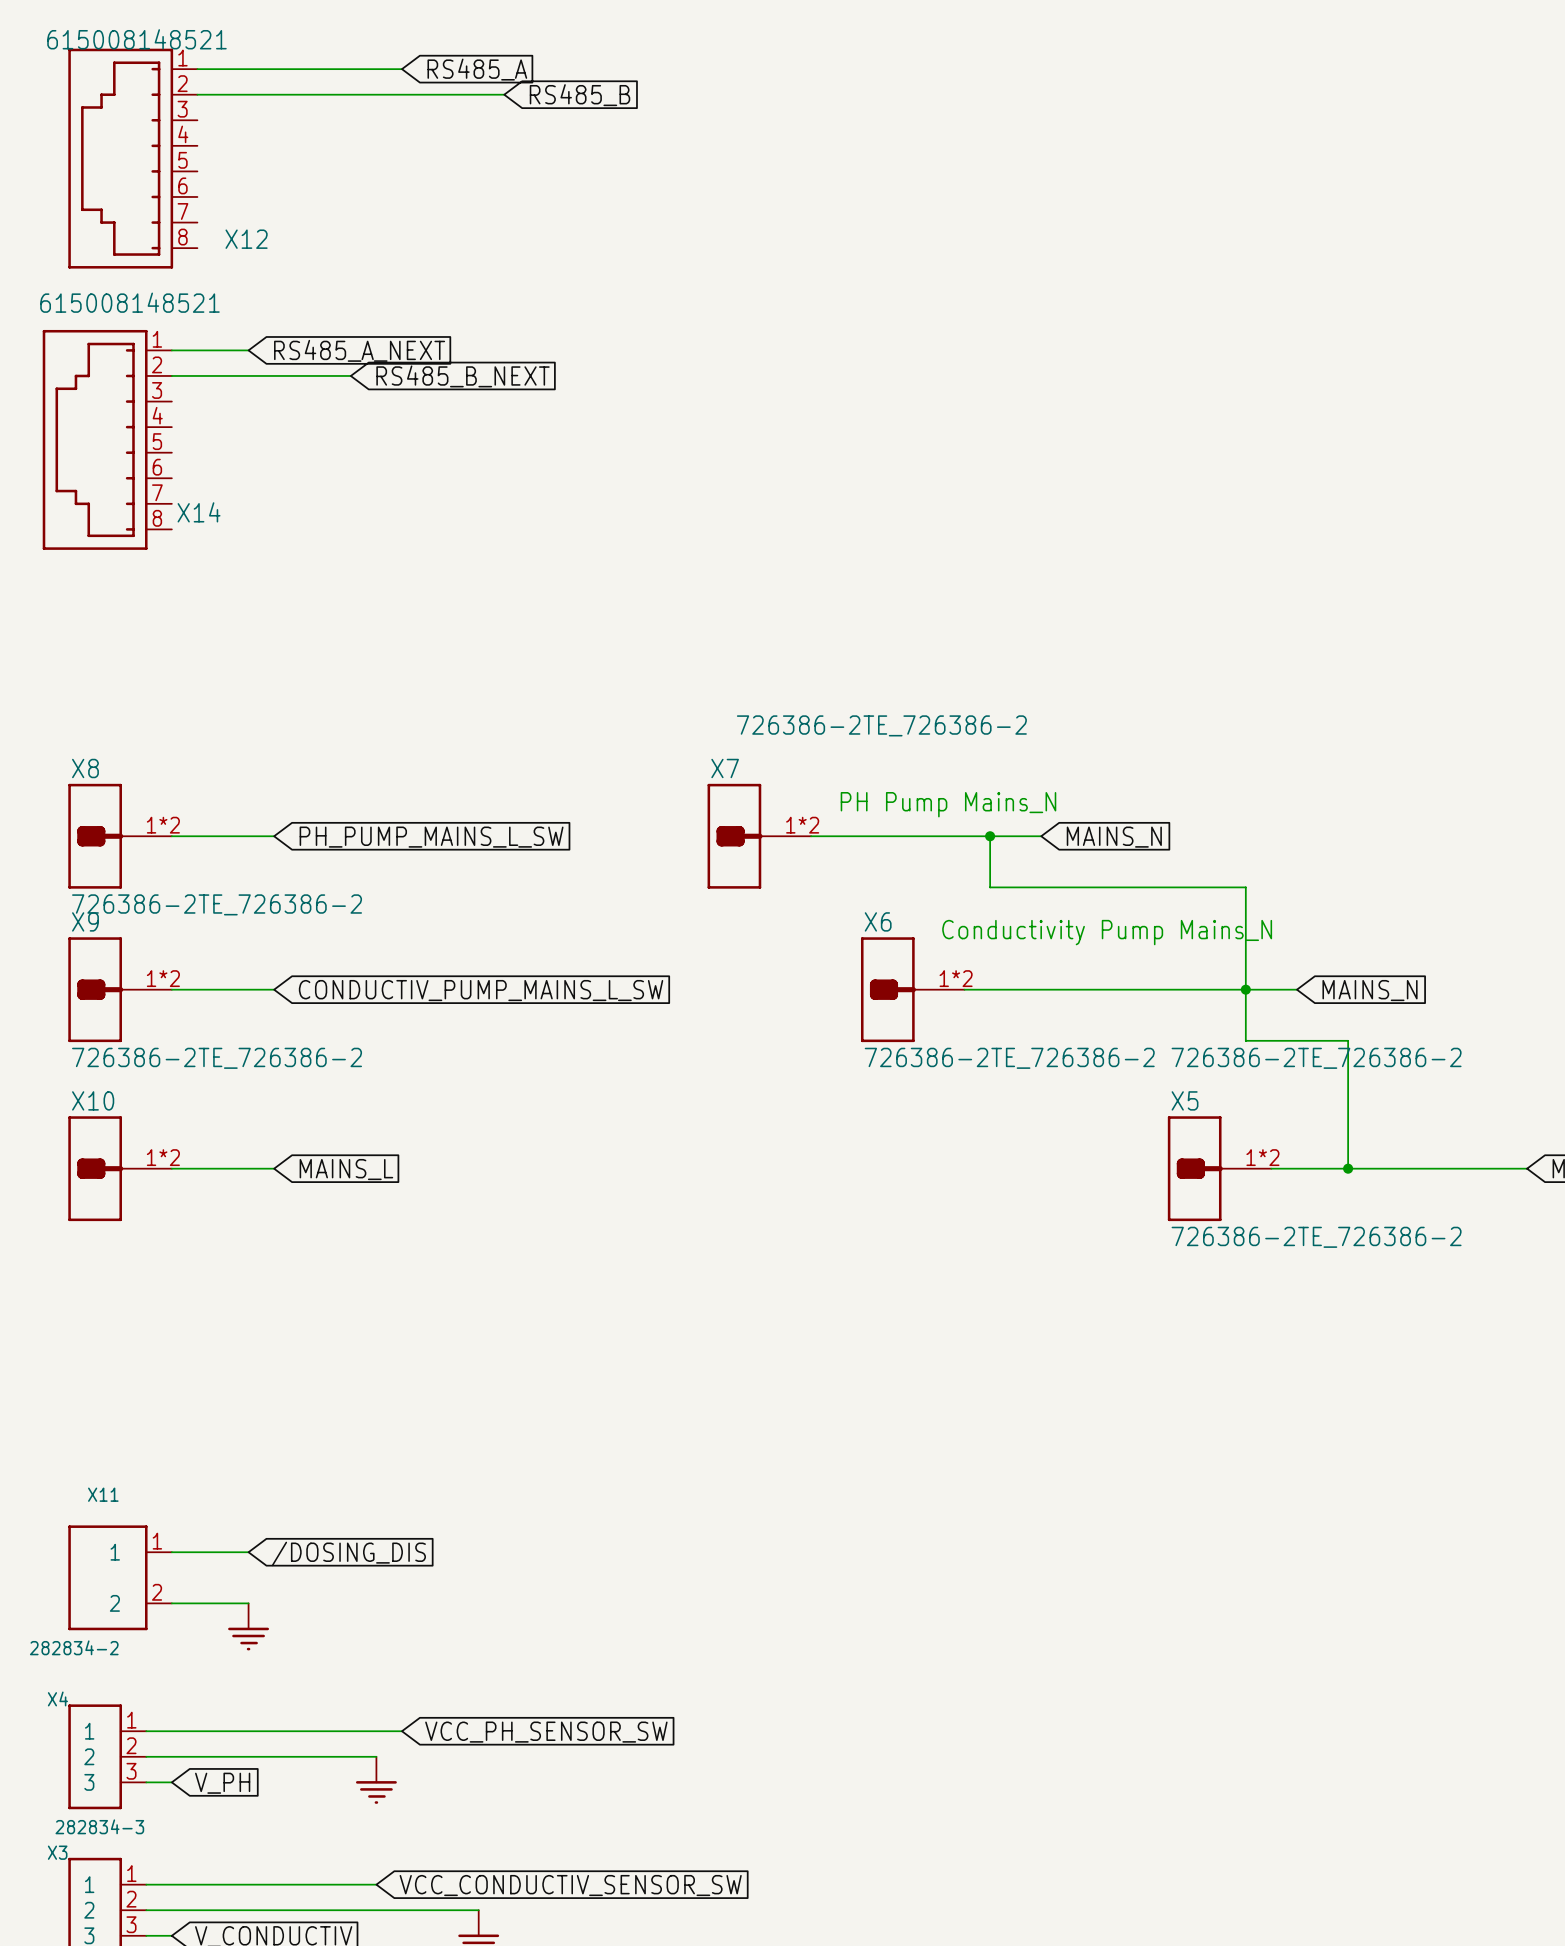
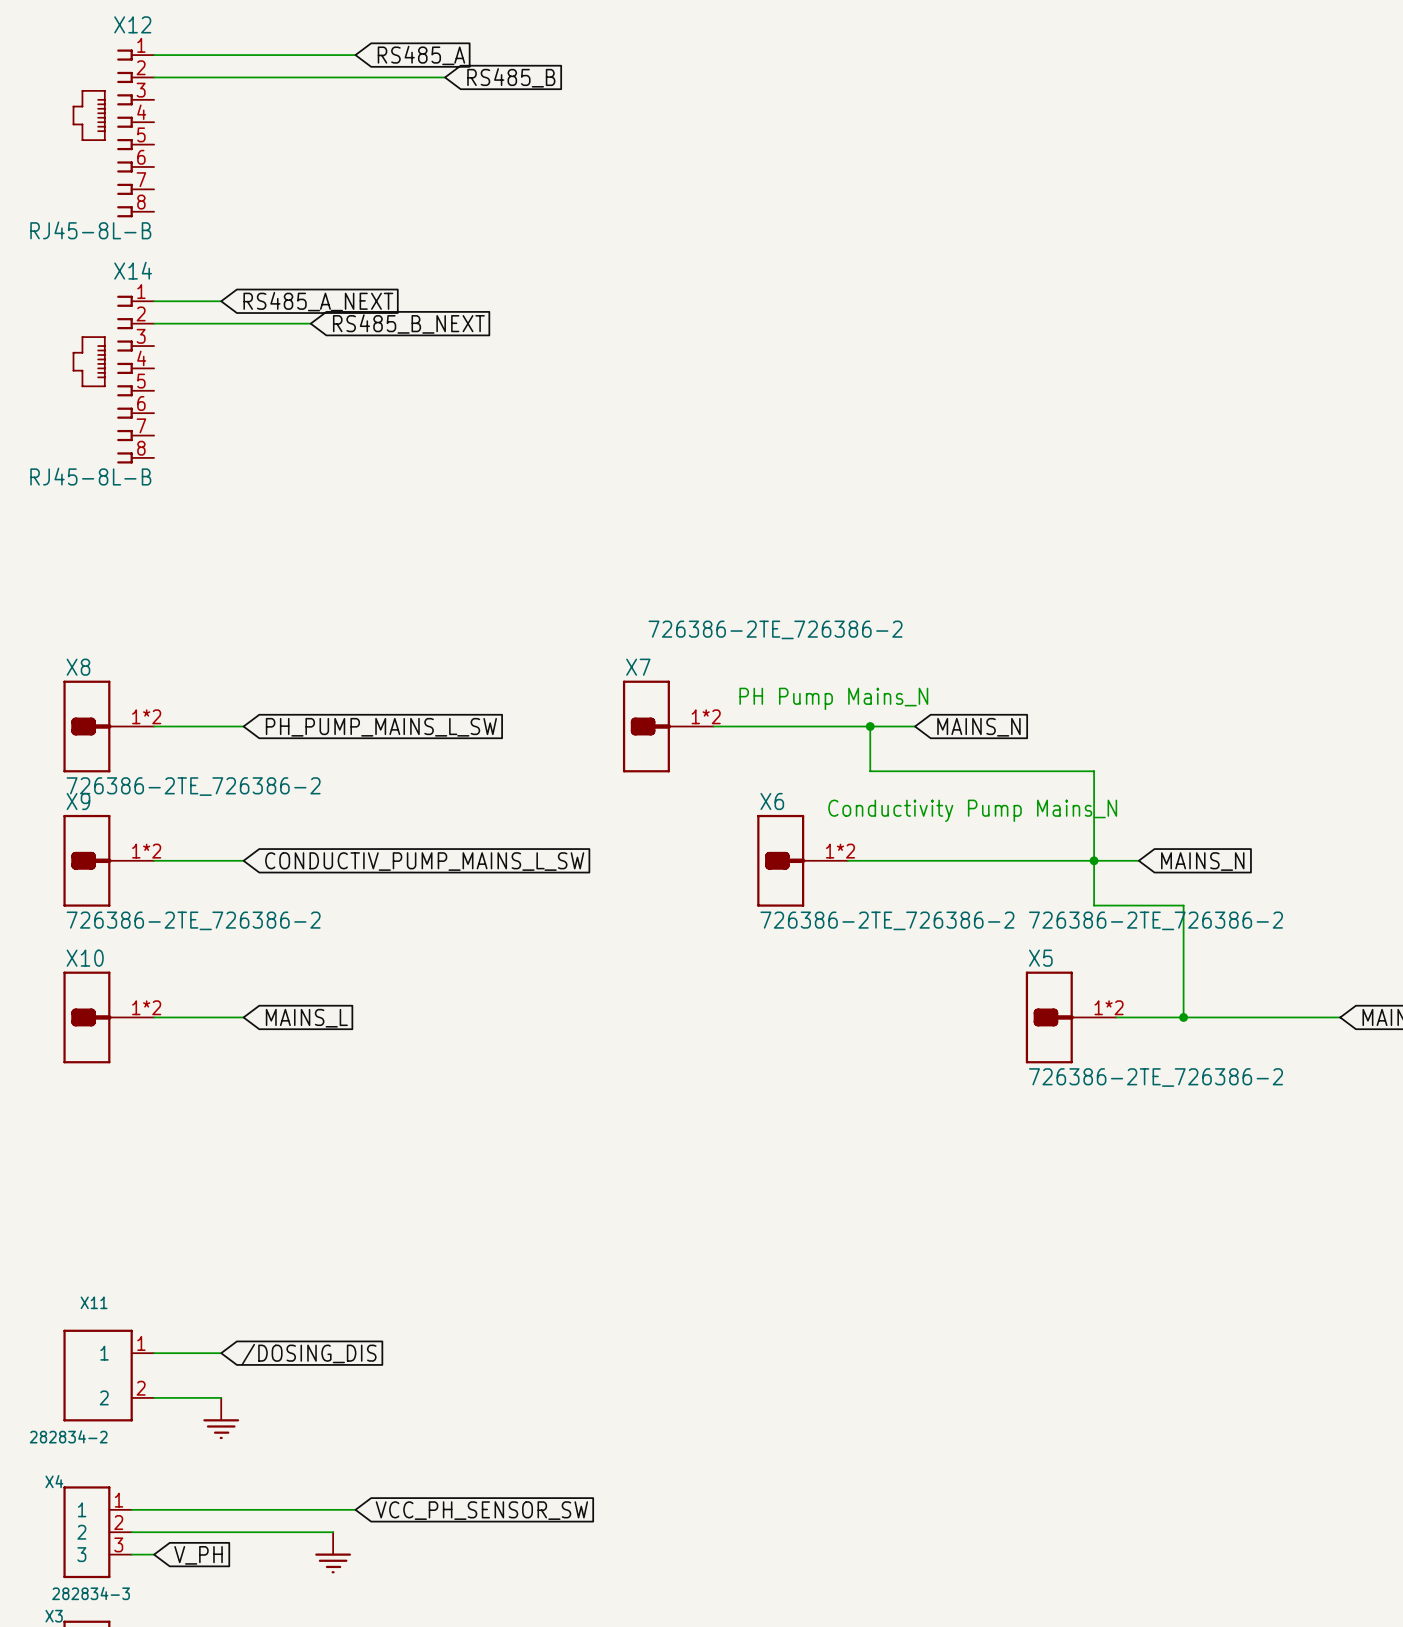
X12 value: 615008148521 (136, 39) -> RJ45-8L-B (90, 230)
X12 symbol: [68, 48, 198, 269] -> [72, 49, 155, 218]
X12 name position: X12 (246, 239) -> X12 (132, 24)
X14 value: 615008148521 (129, 302) -> RJ45-8L-B (90, 476)
X14 symbol: [42, 329, 172, 550] -> [72, 295, 155, 464]
X14 name position: X14 (199, 512) -> X14 (133, 270)

